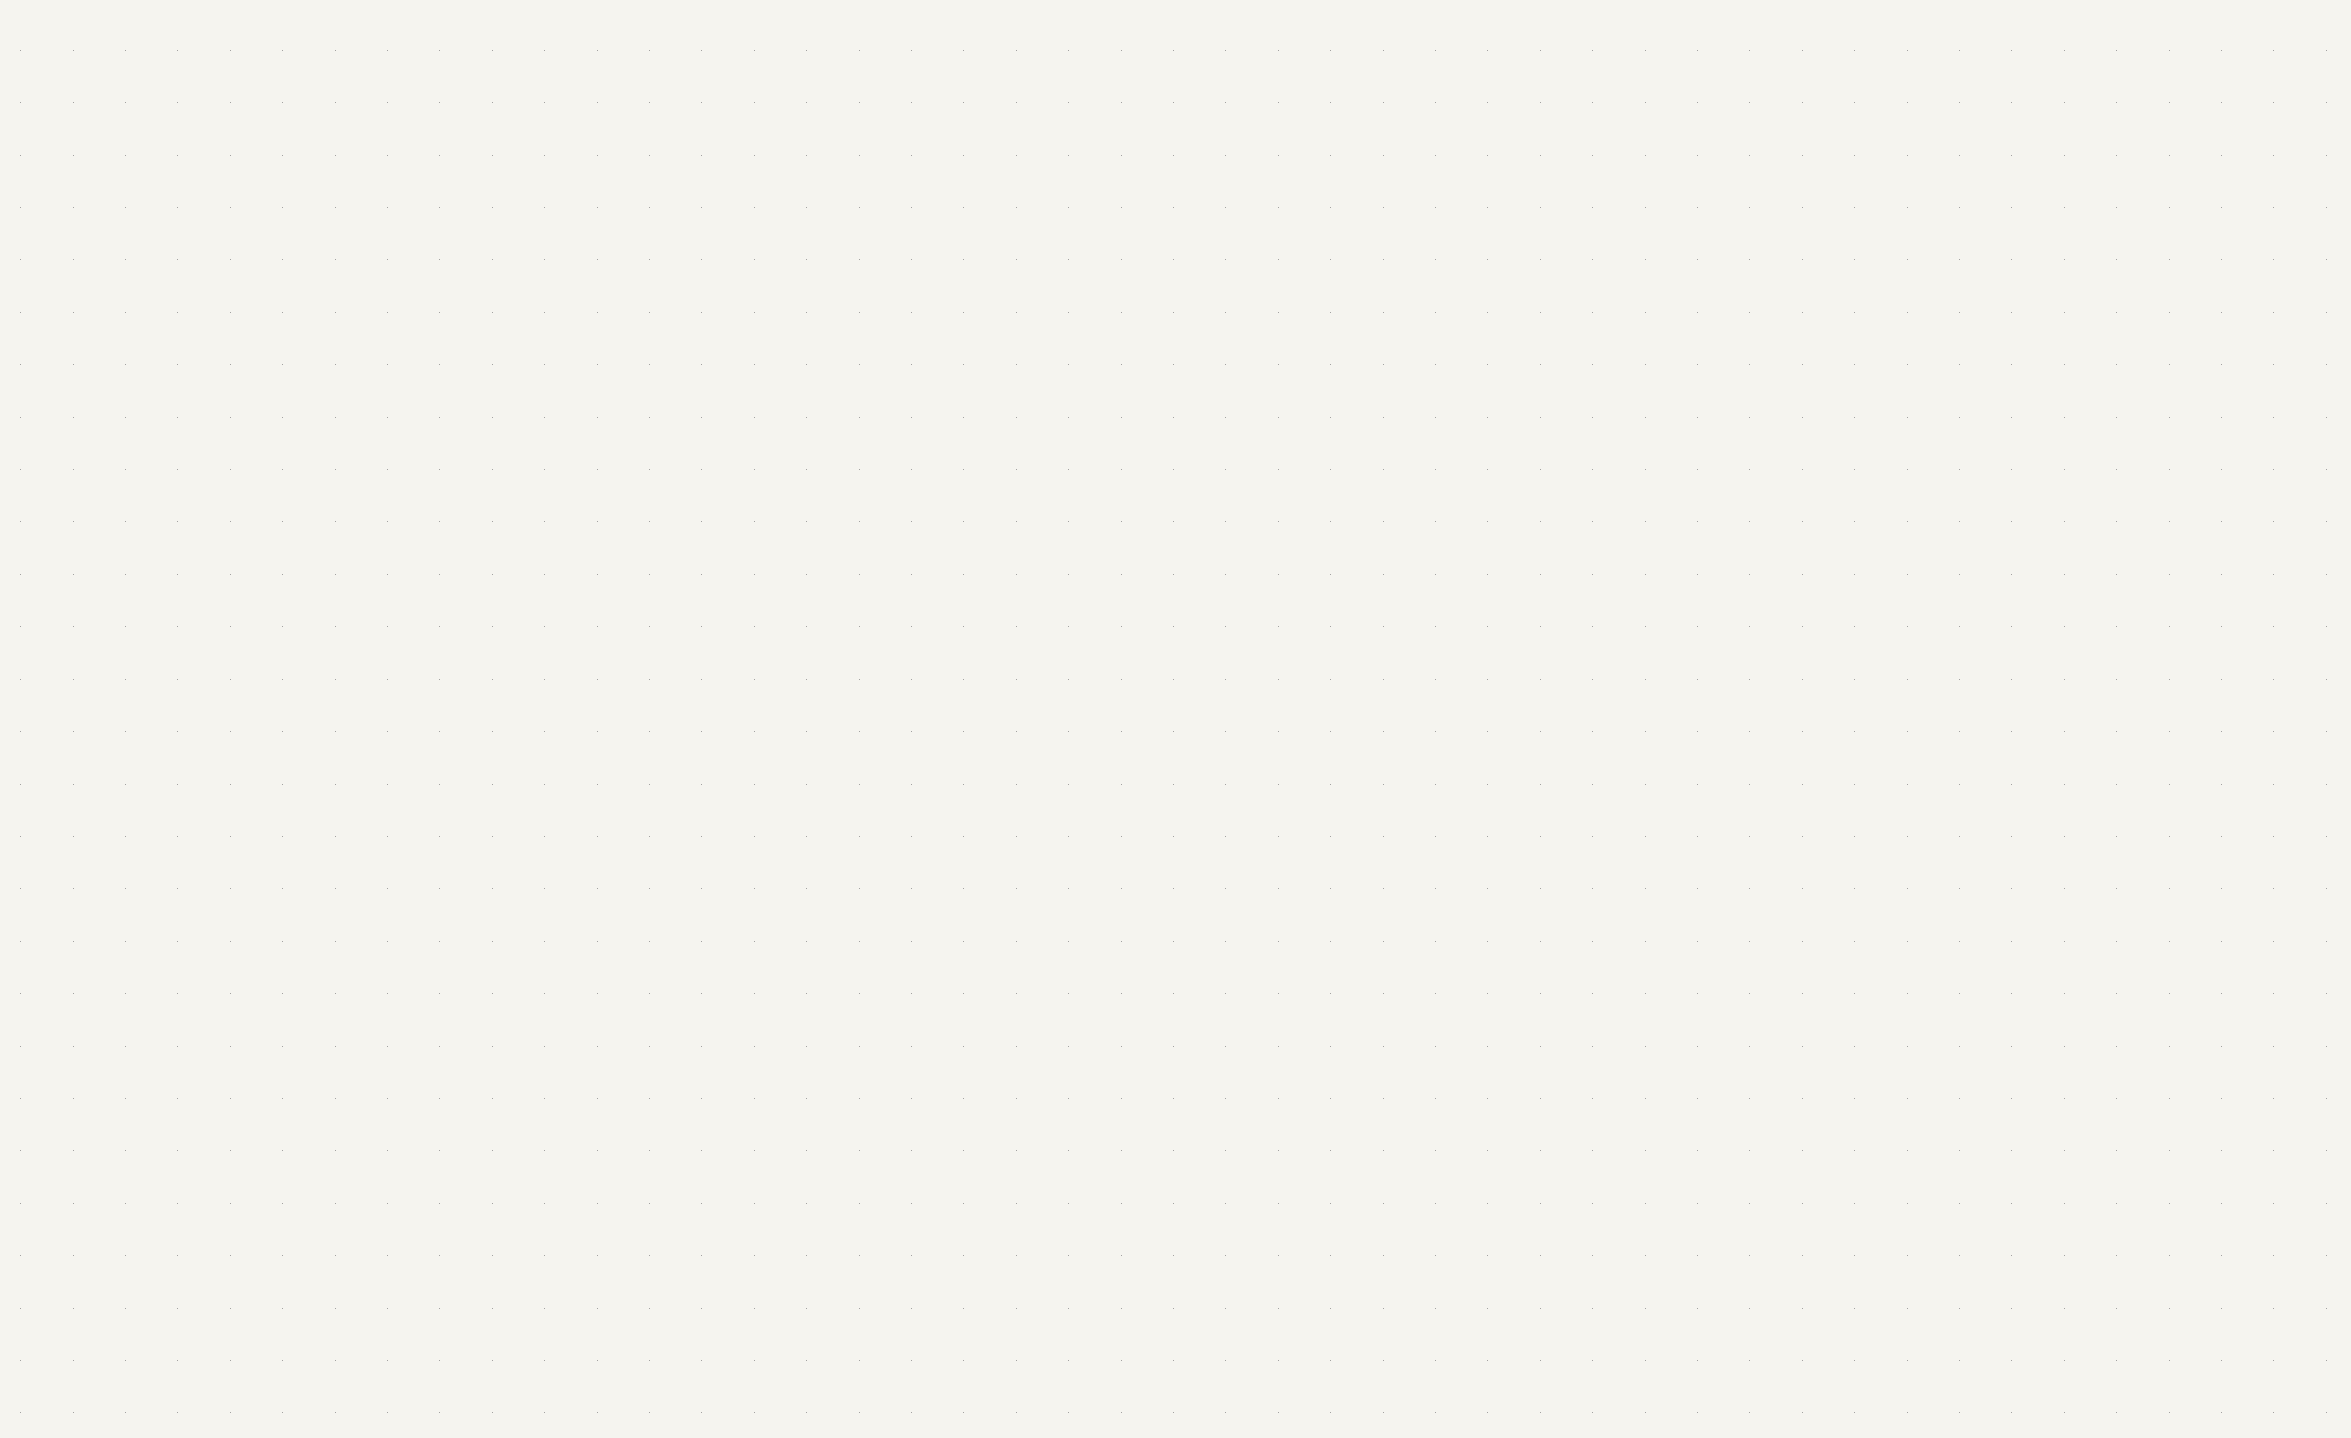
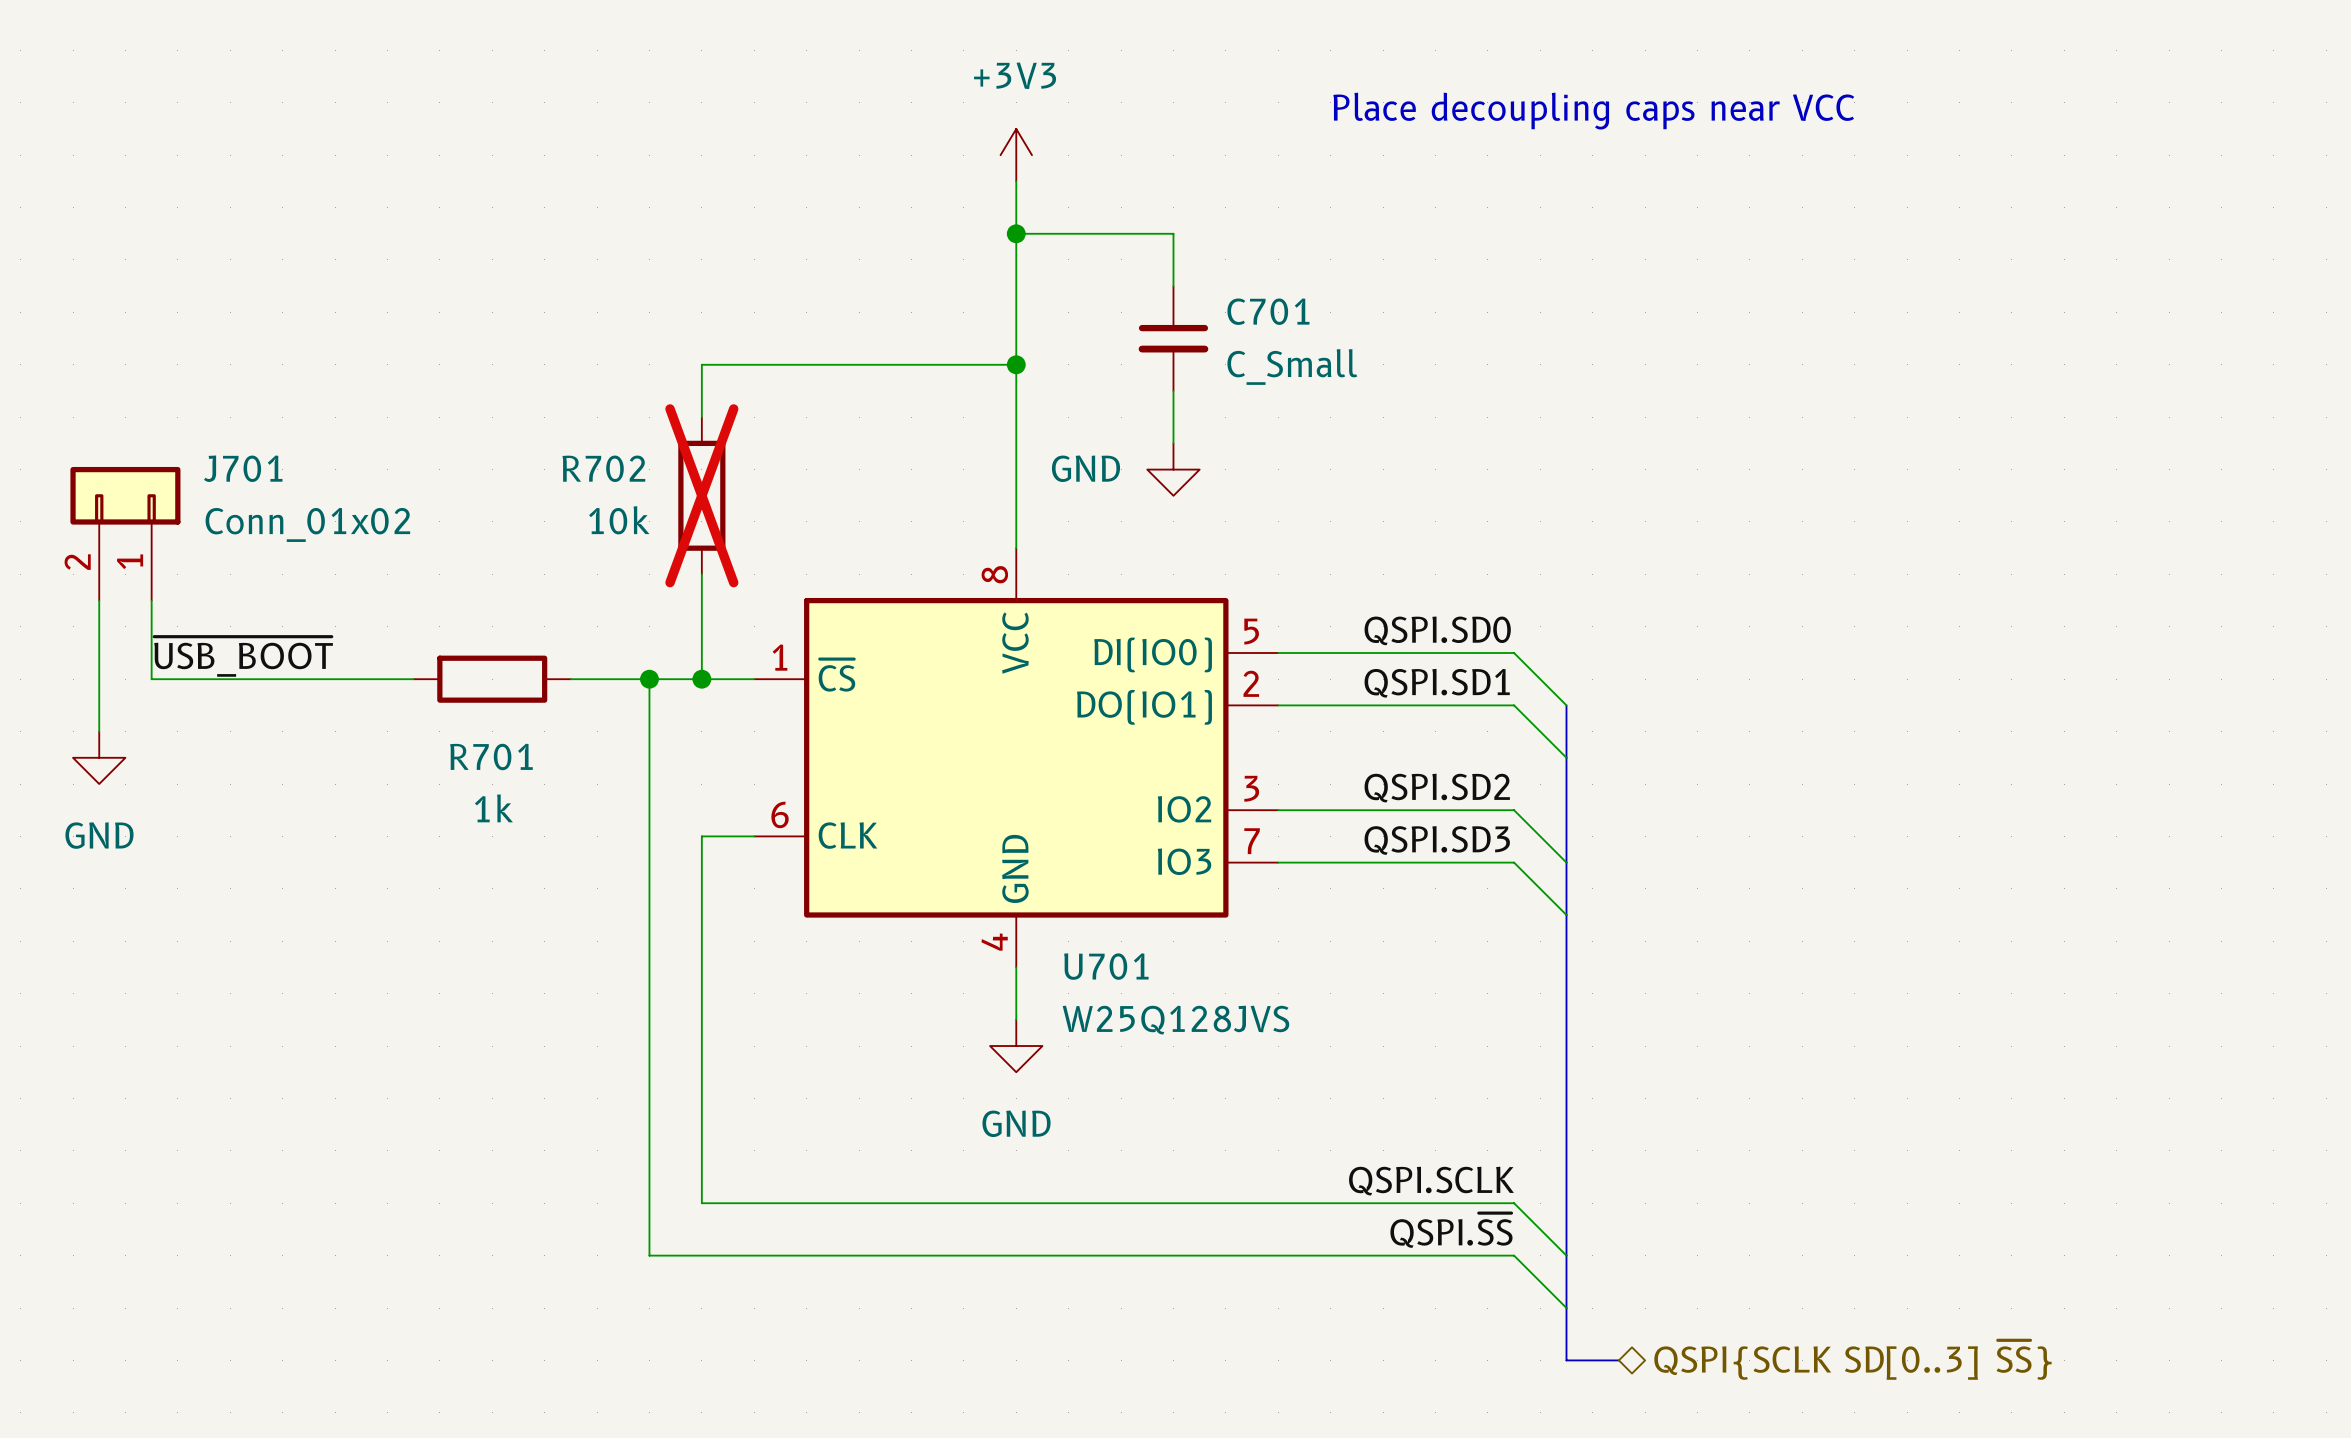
text: none -> Place decoupling caps near VCC (1593, 111)
power symbol: none -> +3V3 (1016, 155)
wire: none -> (1016, 181) (1016, 548)
wire: none -> (1016, 233) (1173, 233) (1173, 286)
junction: none -> (1016, 233)
C701: none -> C_Small (1173, 338)
wire: none -> (1016, 364) (701, 364) (701, 417)
junction: none -> (1016, 364)
wire: none -> (1173, 390) (1173, 443)
power symbol: none -> GND (1173, 469)
R702: none -> 10k (701, 495)
J701: none -> Conn_01x02 (125, 533)
wire: none -> (701, 574) (701, 679)
wire: none -> (99, 600) (99, 731)
wire: none -> (151, 600) (151, 679) (413, 679)
label: none -> QSPI.SD0 (1437, 630)
wire: none -> (1278, 652) (1514, 652) (1566, 705)
label: none -> ~{USB_BOOT} (243, 656)
R701: none -> 1k (492, 679)
wire: none -> (570, 679) (754, 679)
wire: none -> (649, 679) (649, 1255) (1514, 1255) (1566, 1308)
junction: none -> (649, 679)
junction: none -> (701, 679)
label: none -> QSPI.SD1 (1437, 683)
wire: none -> (1278, 705) (1514, 705) (1566, 757)
bus: none -> (1566, 705) (1566, 1360) (1618, 1360)
power symbol: none -> GND (99, 757)
U701: none -> W25Q128JVS (1016, 757)
label: none -> QSPI.SD2 (1437, 788)
wire: none -> (1278, 810) (1514, 810) (1566, 862)
wire: none -> (754, 836) (701, 836) (701, 1203) (1514, 1203) (1566, 1255)
label: none -> QSPI.SD3 (1437, 840)
wire: none -> (1278, 862) (1514, 862) (1566, 915)
wire: none -> (1016, 967) (1016, 1019)
power symbol: none -> GND (1016, 1046)
label: none -> QSPI.SCLK (1431, 1181)
label: none -> QSPI.~{SS} (1451, 1230)
hierarchical label: none -> QSPI{SCLK SD[0..3] ~{SS}} (1852, 1360)

